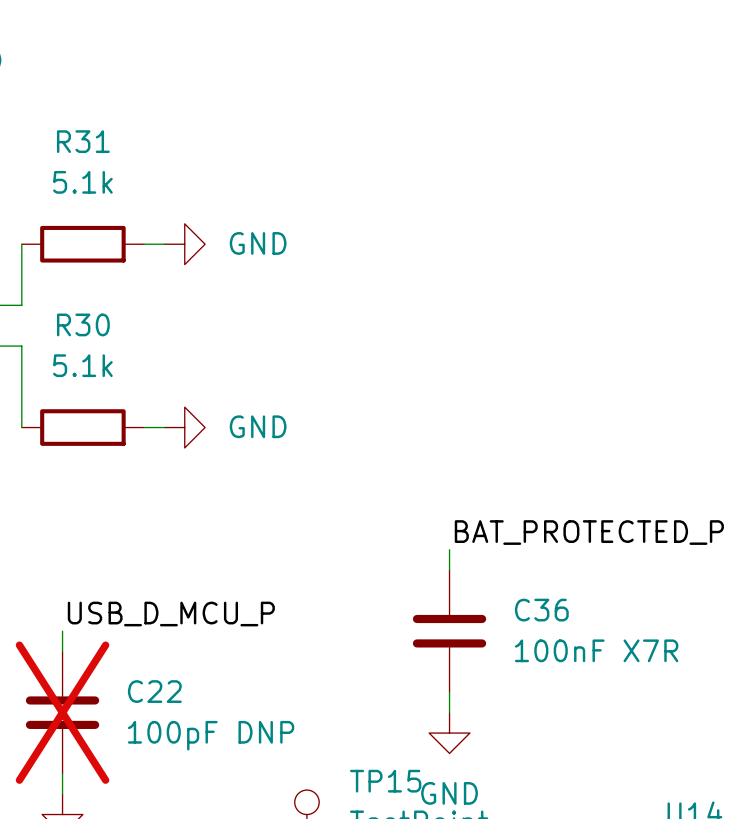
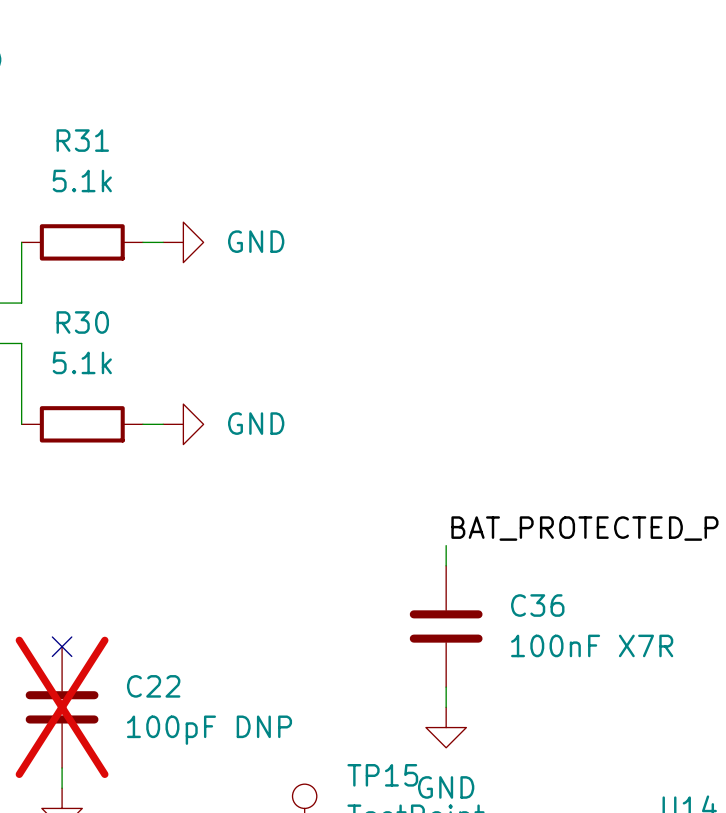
label: USB_D_MCU_P (171, 614) -> none
wire: (62, 631) (62, 651) -> none
no-connect mark: none -> (62, 646)

